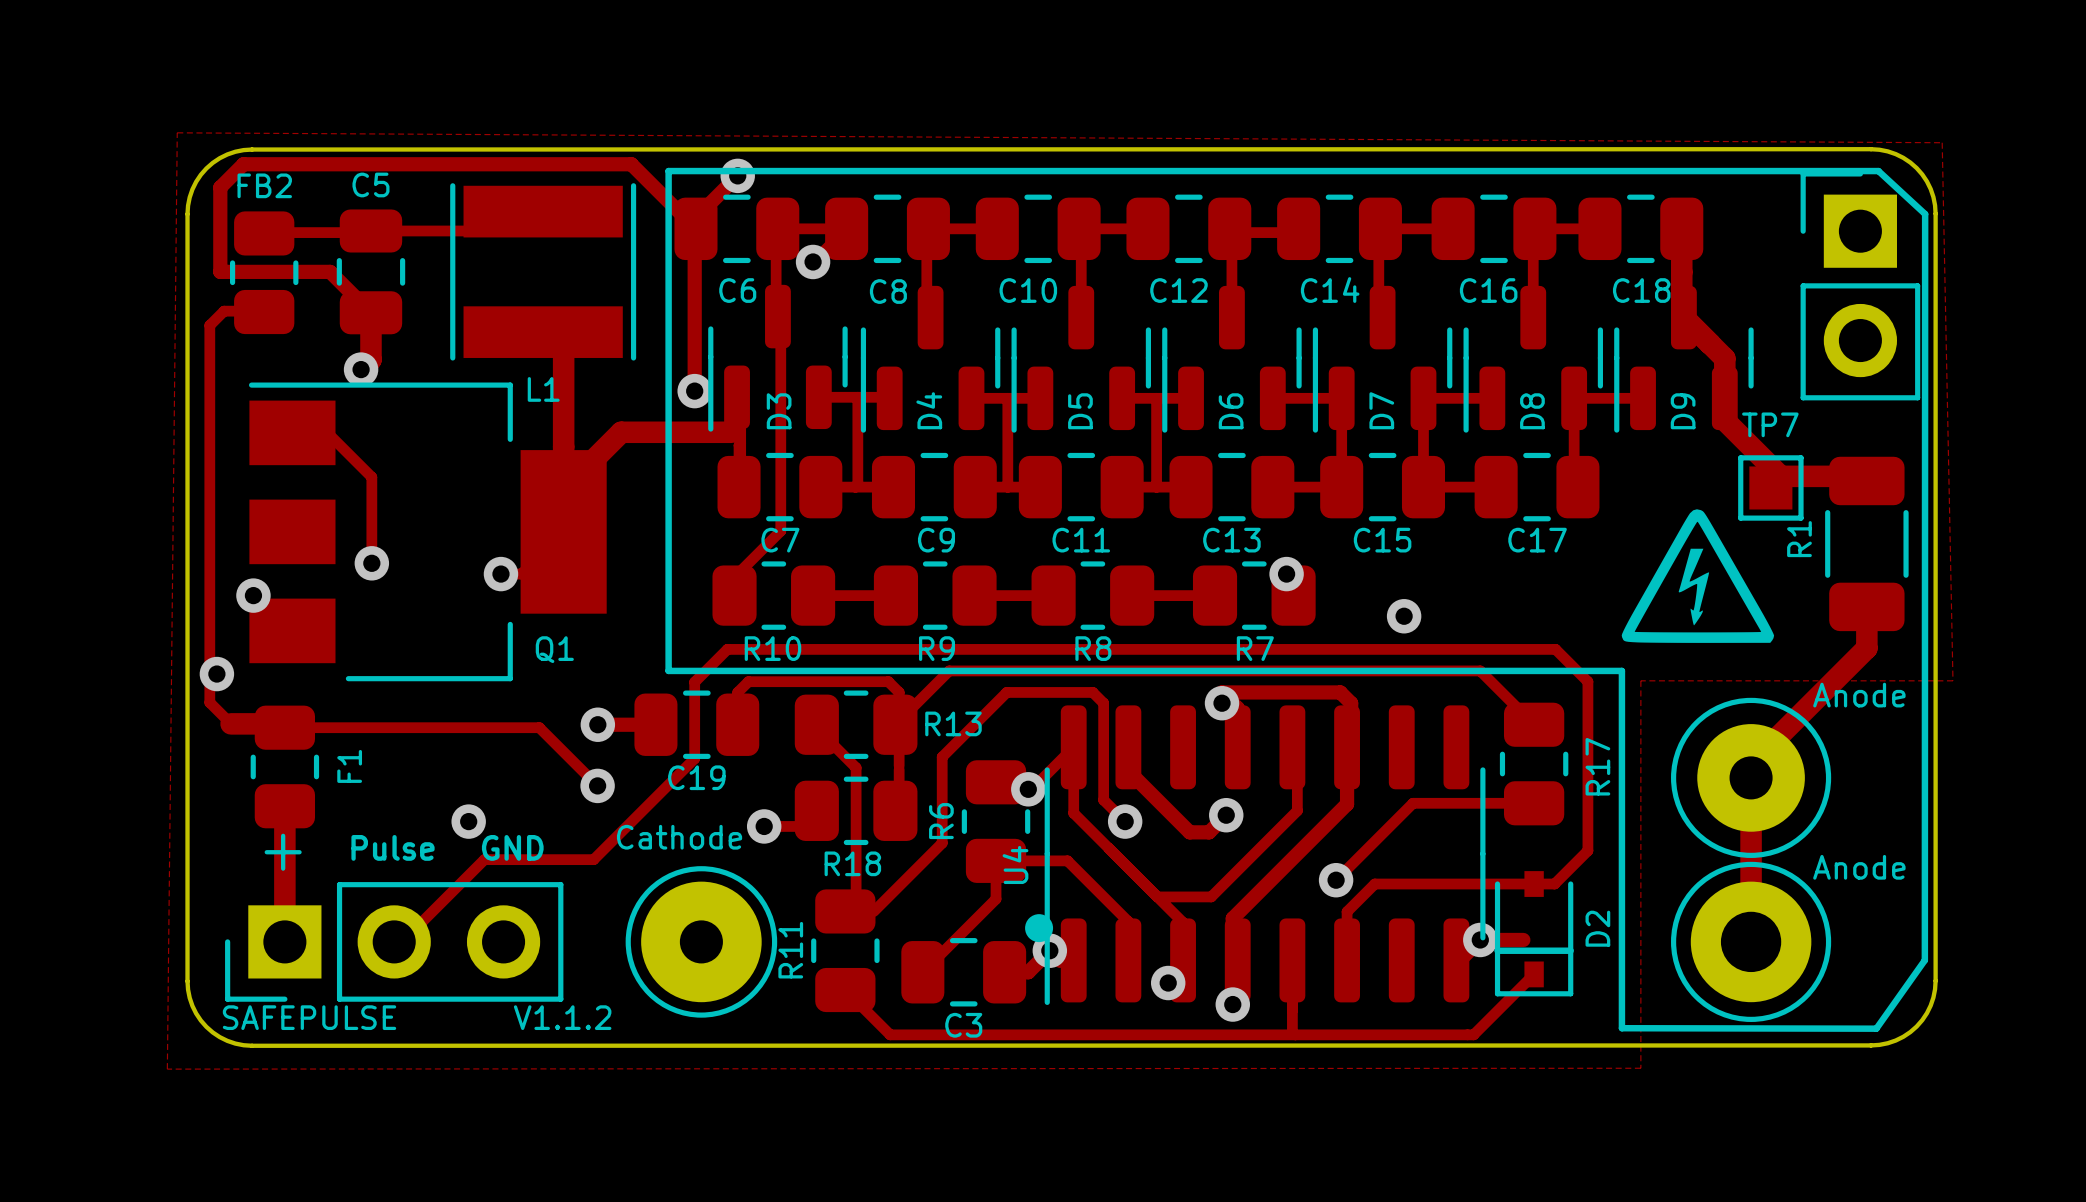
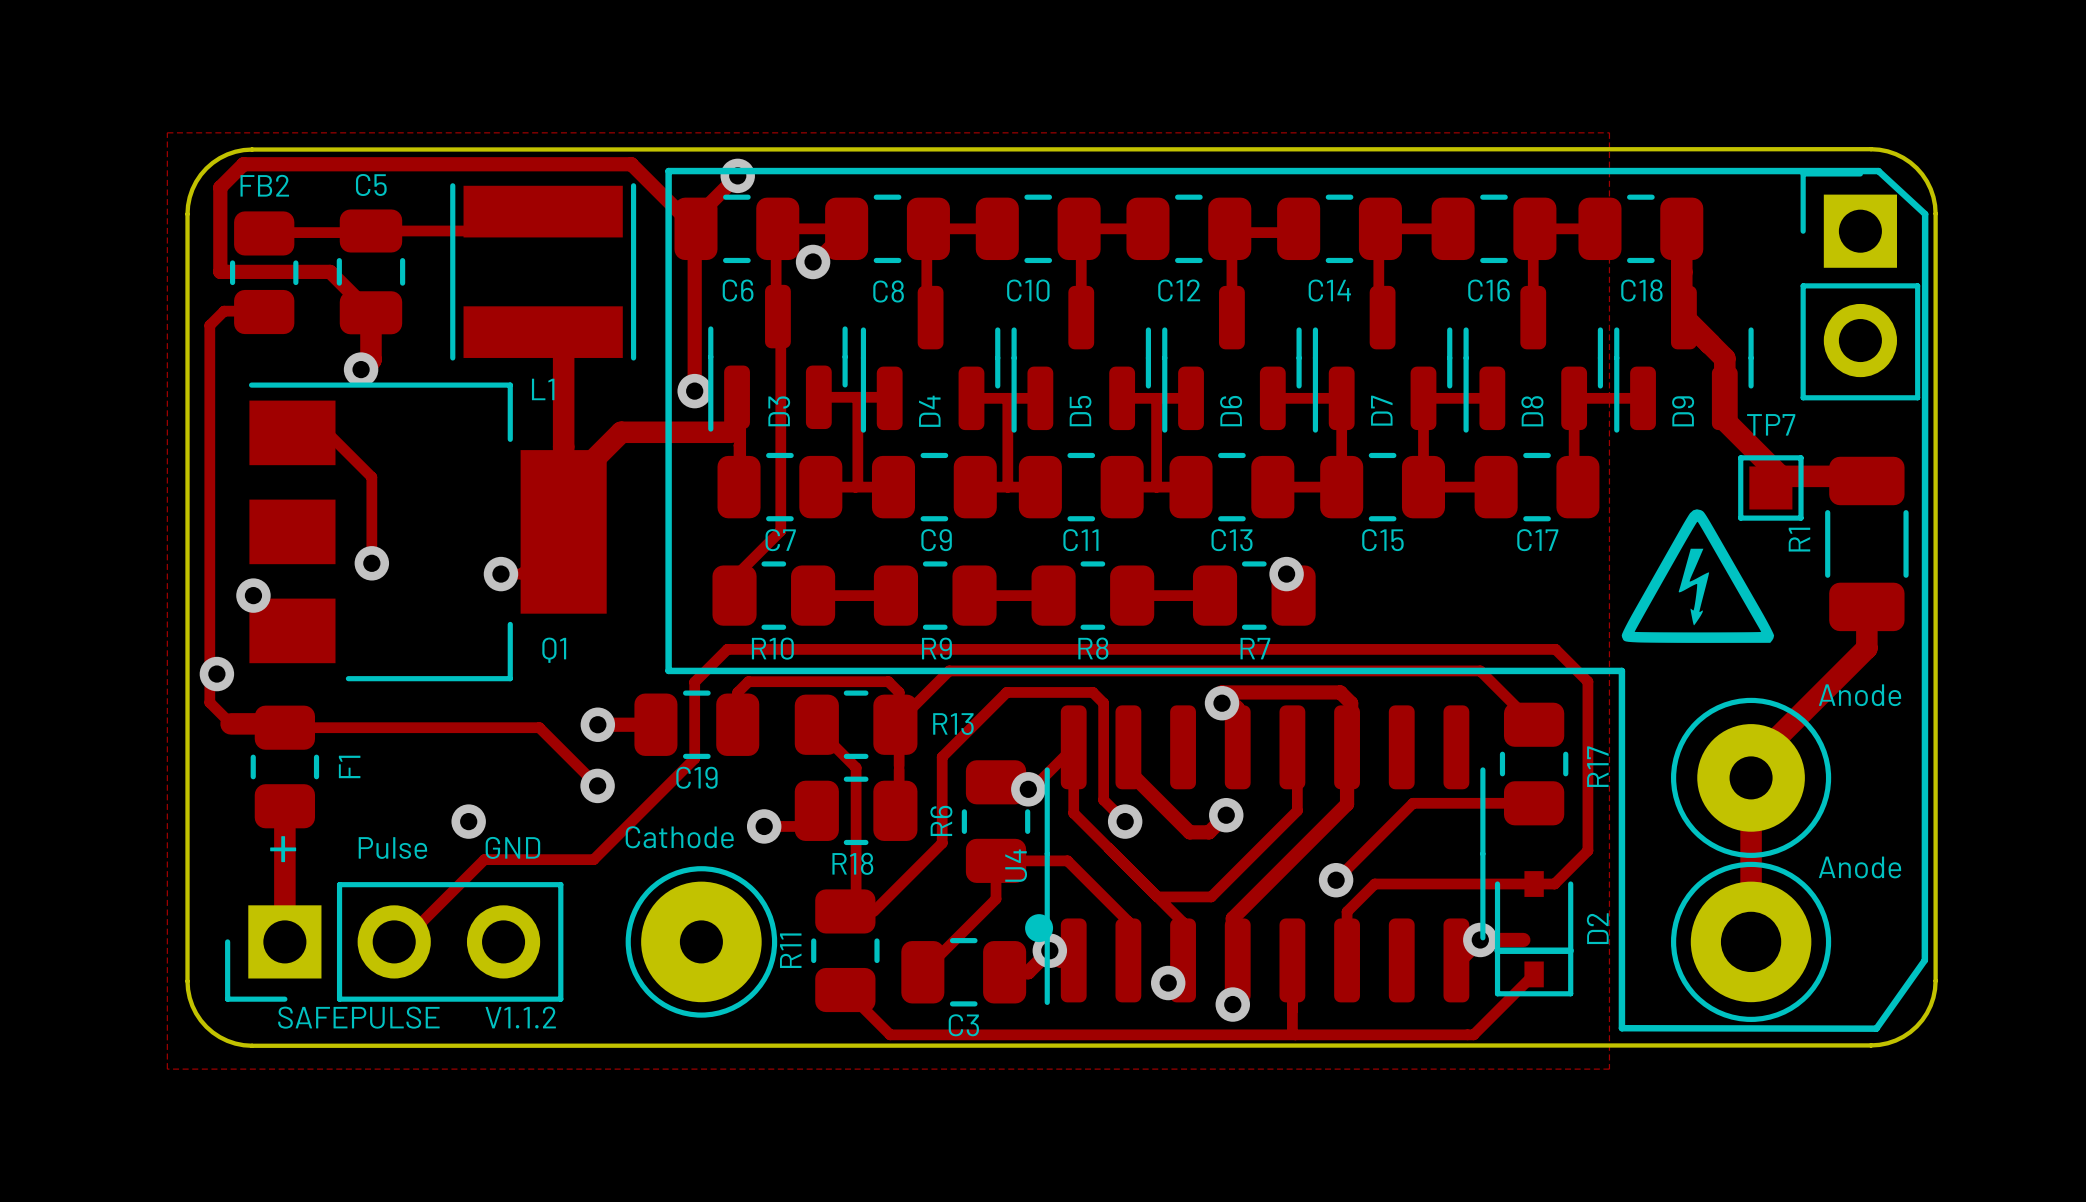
zone outline: (177, 132) (167, 1069) (1640, 1068) (1640, 680) (1952, 680) (1942, 142) (177, 132) -> (167, 132) (167, 1069) (1609, 1069) (1609, 132) (167, 132)
via: (1404, 616) -> none

